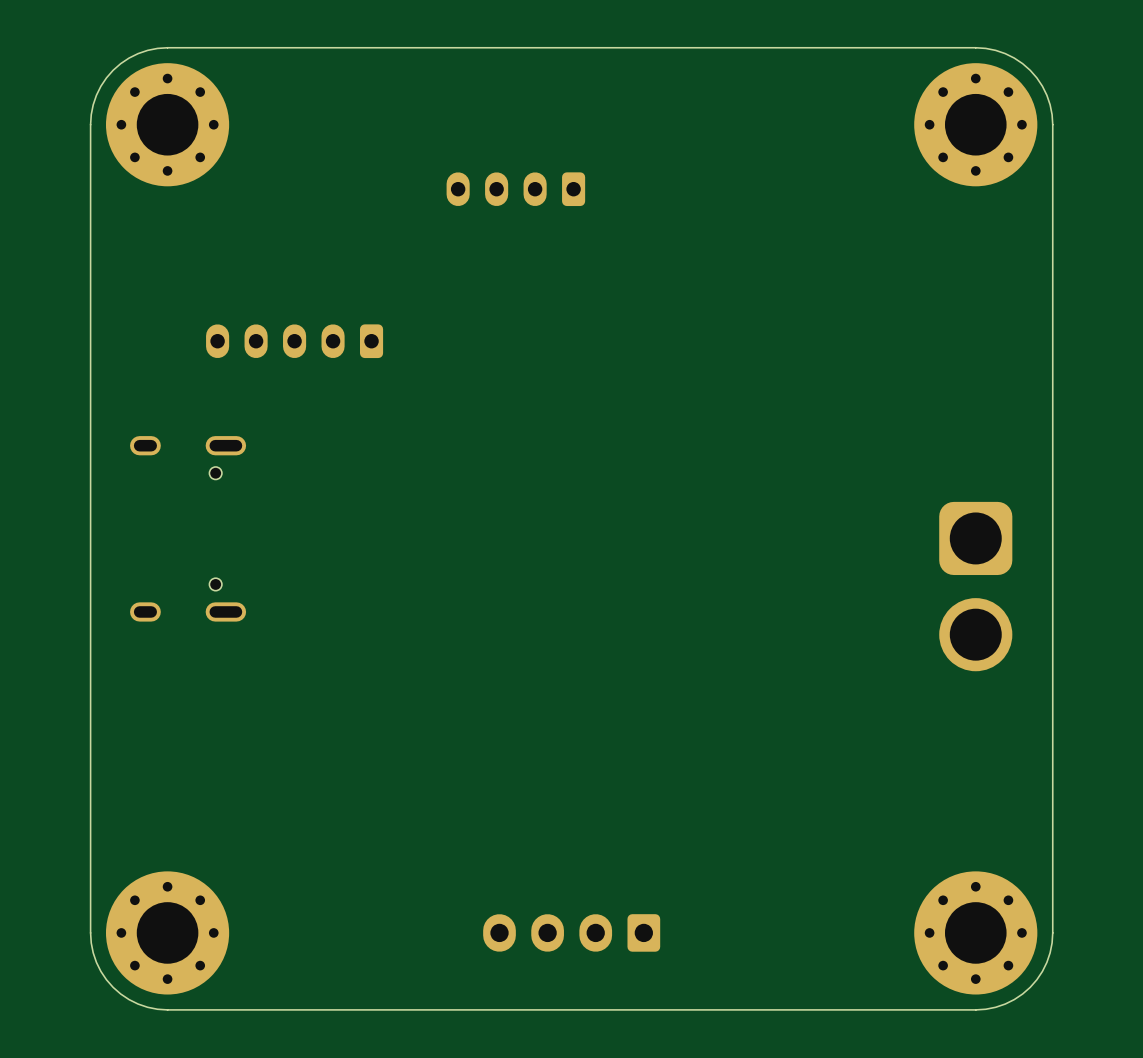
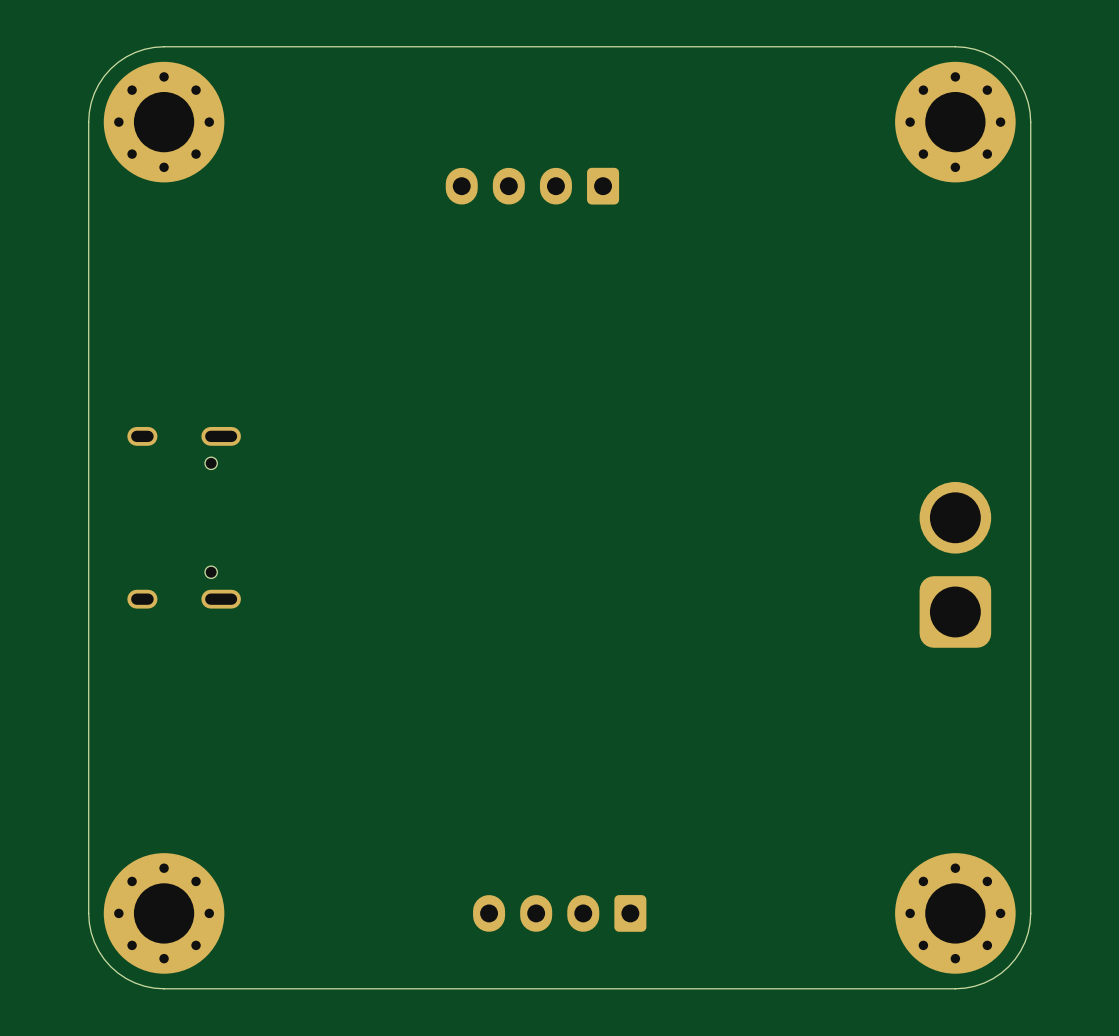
part: (515, 189) -> none
part: none -> (532, 186)
part: (294, 341) -> none
part rotation: 0° (975, 586) -> 180° (955, 564)

